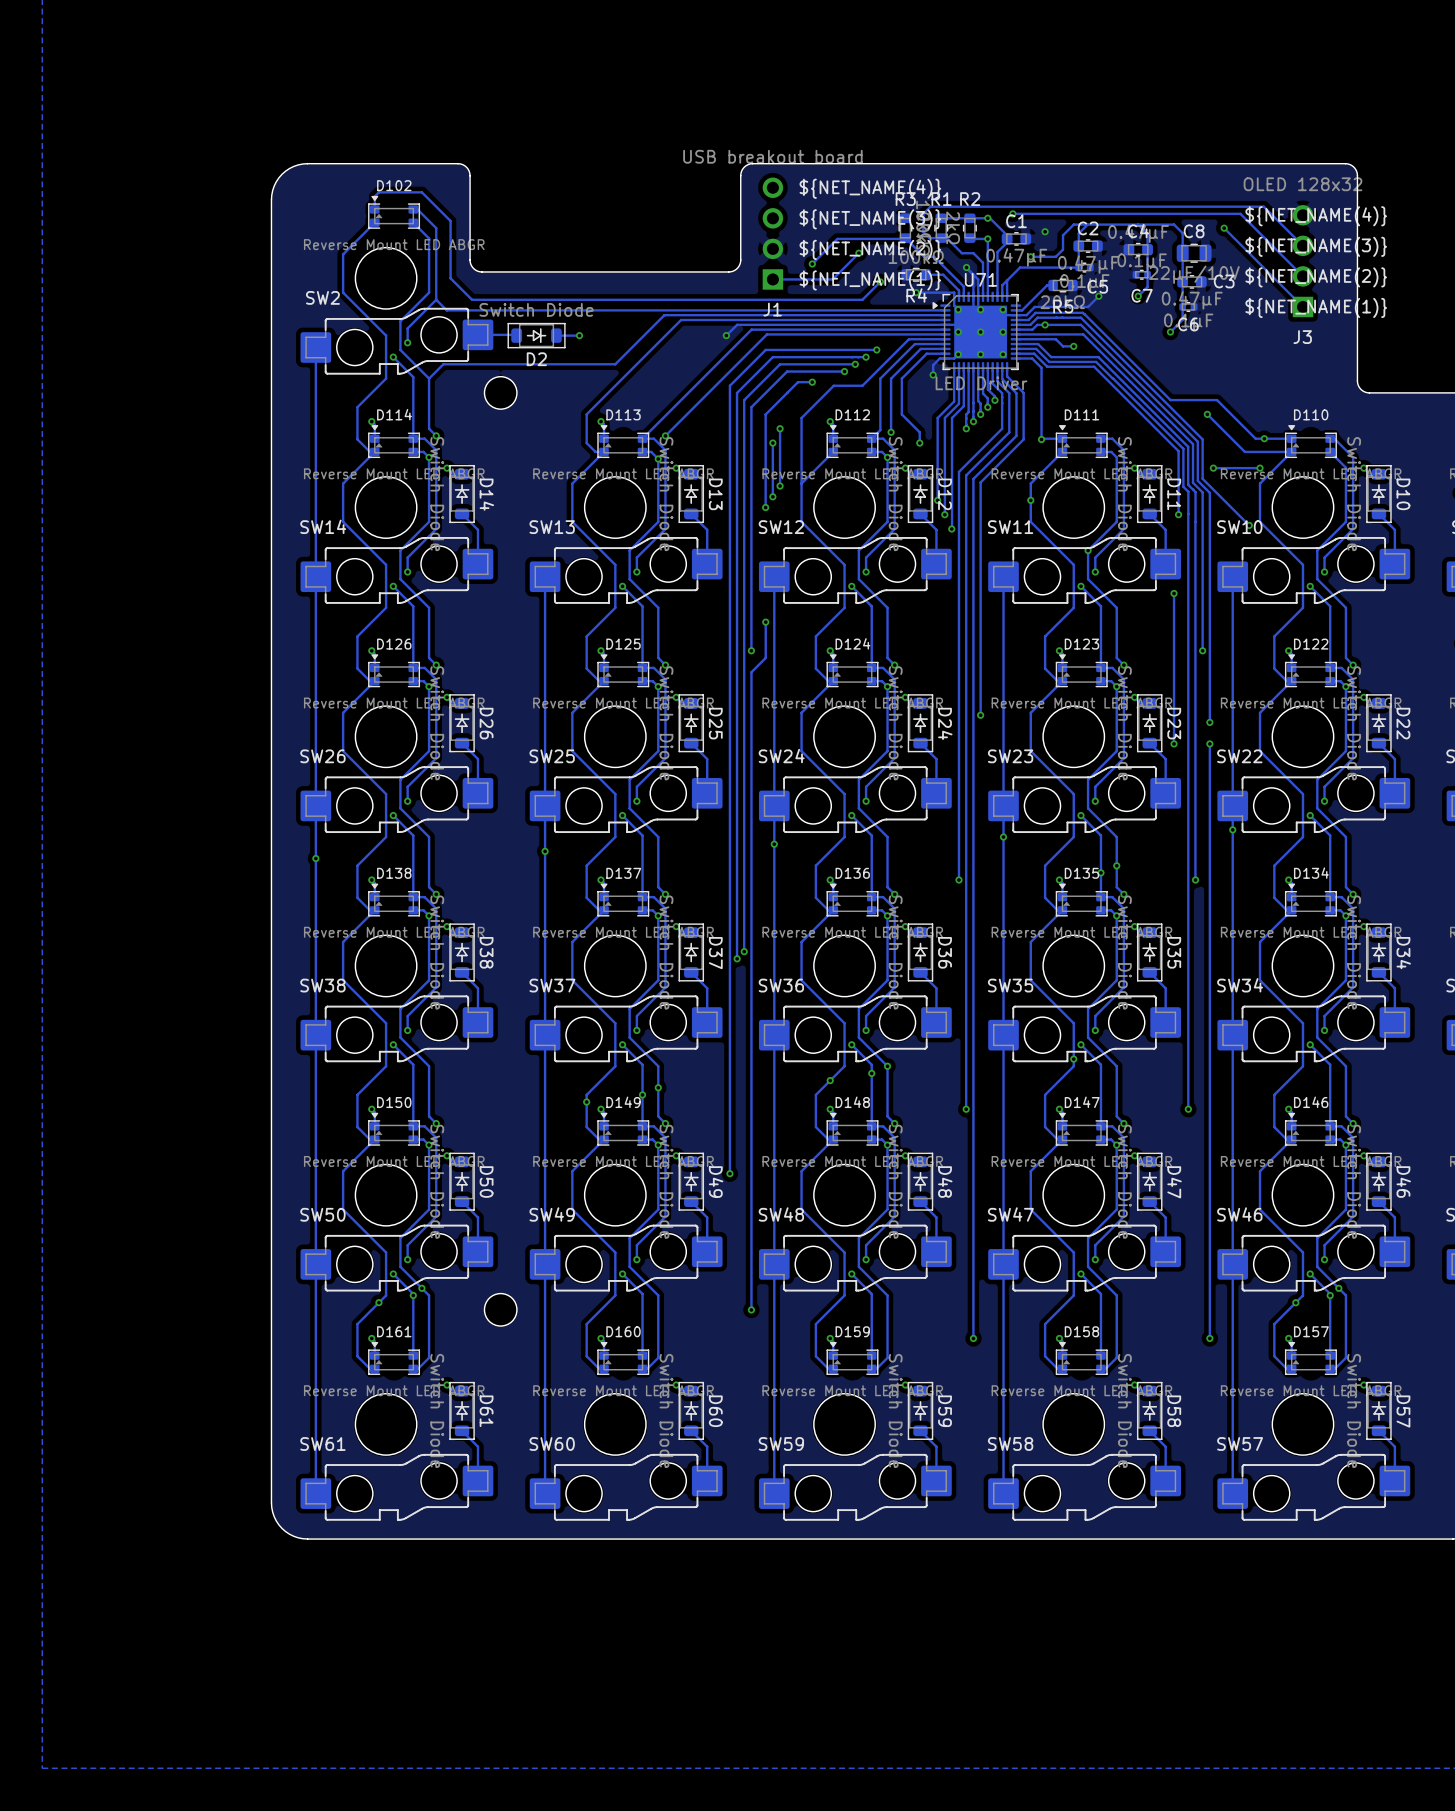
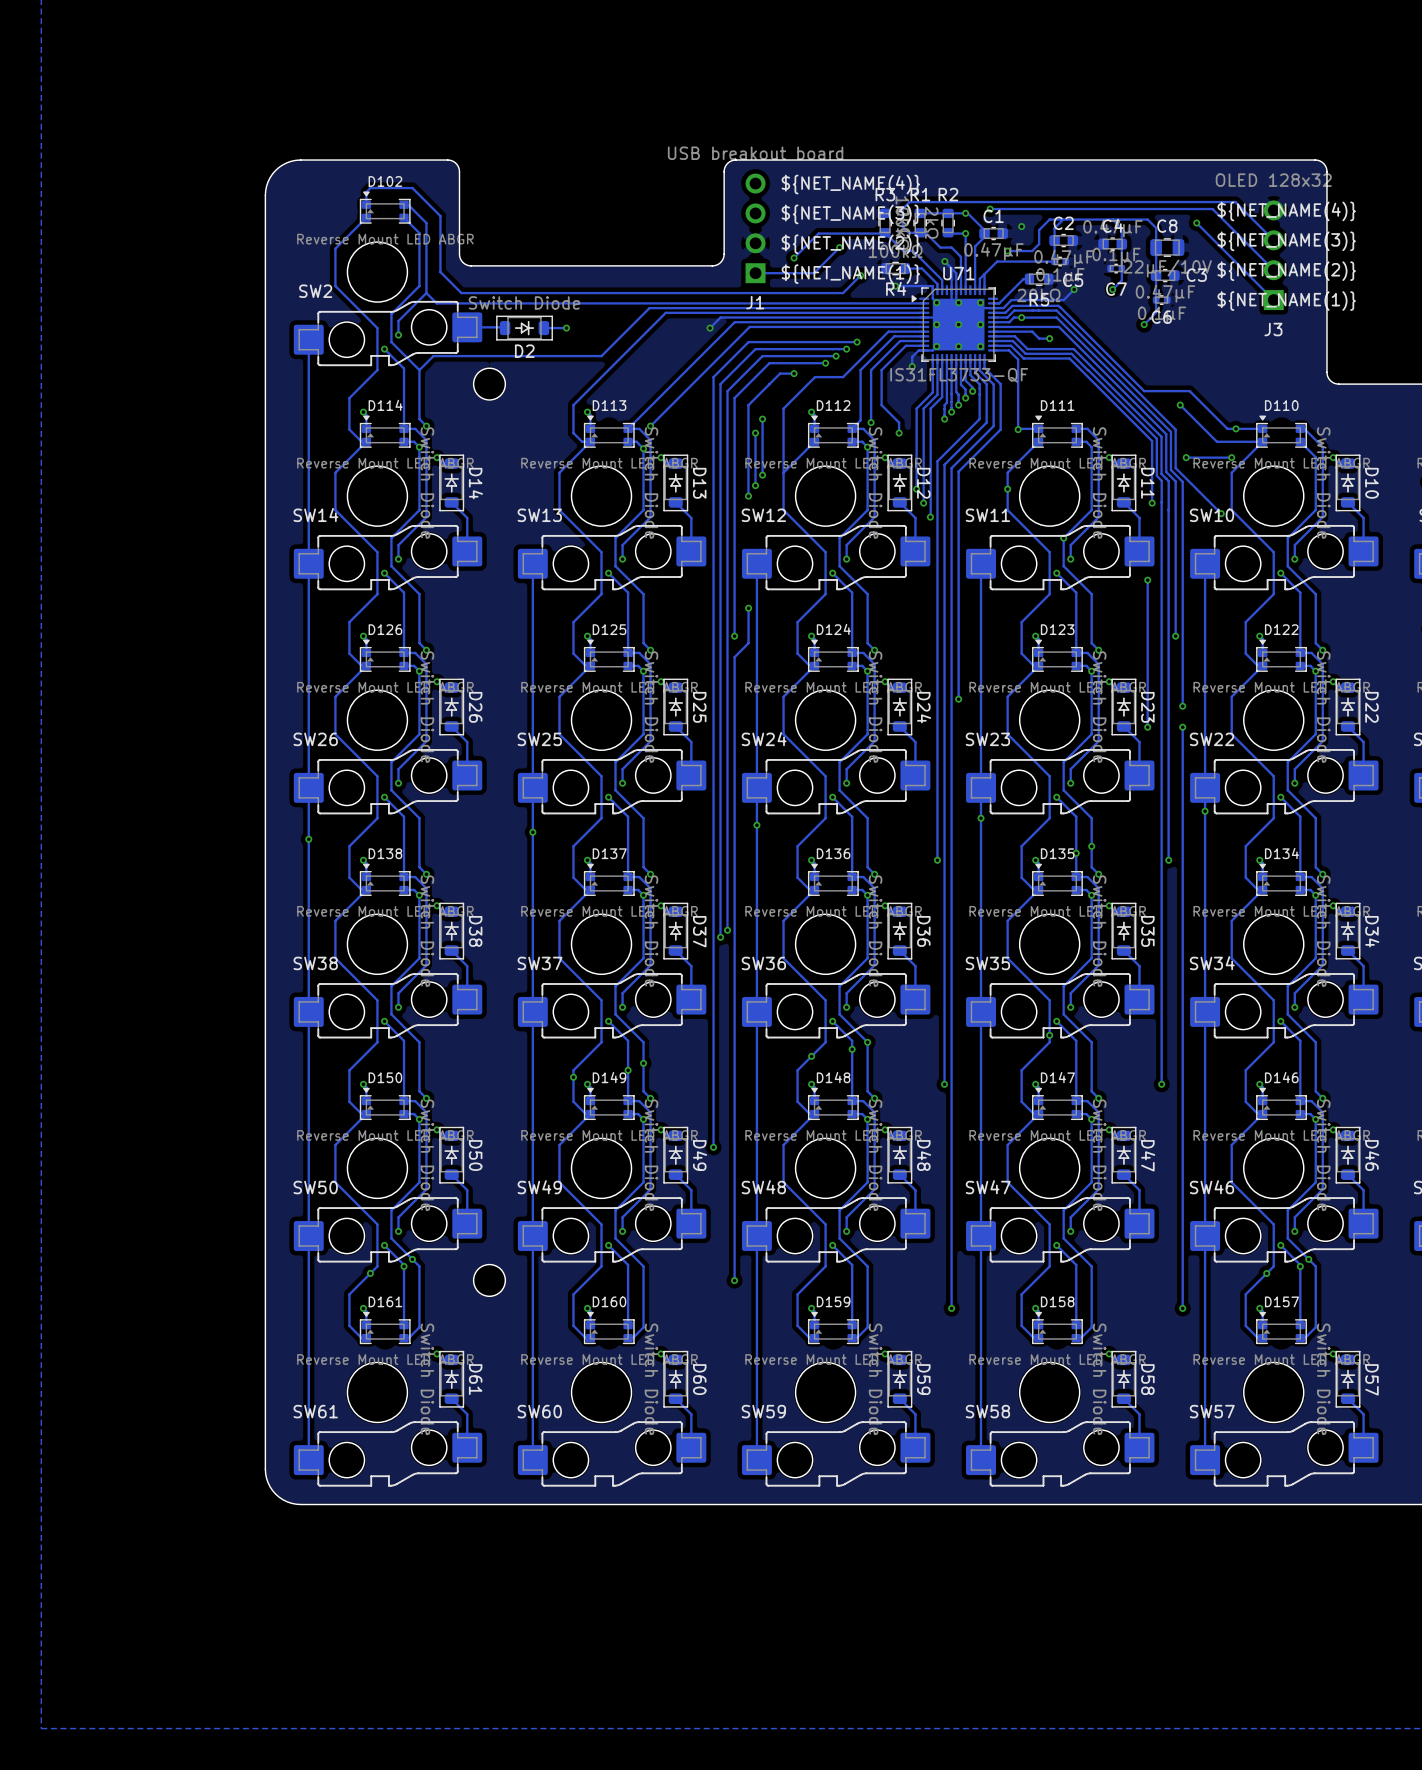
U71 value: LED Driver (981, 383) -> IS31FL3733-QF (959, 375)

